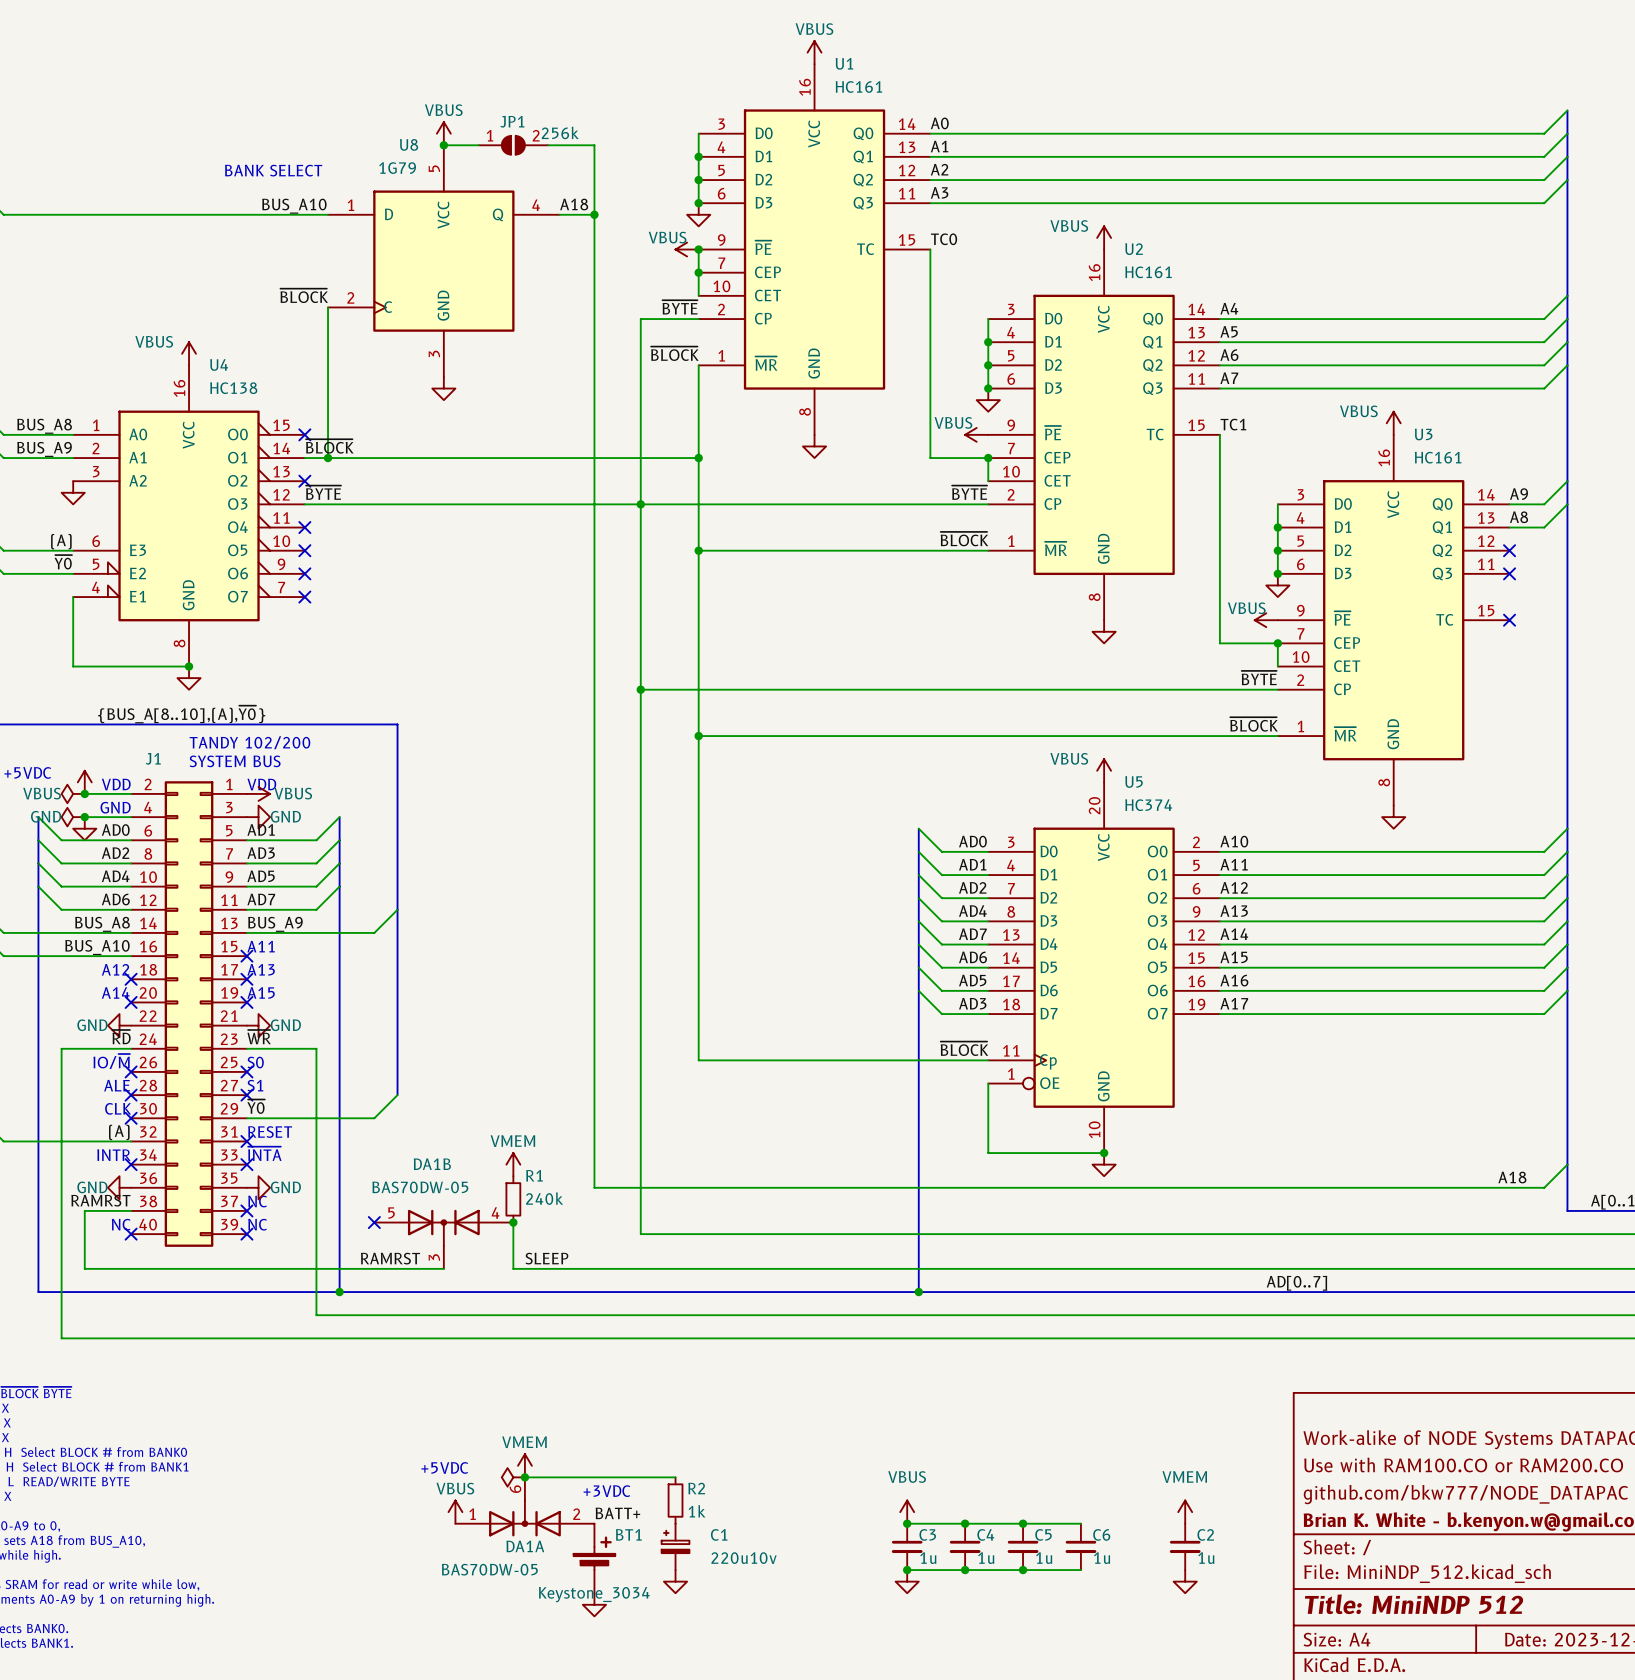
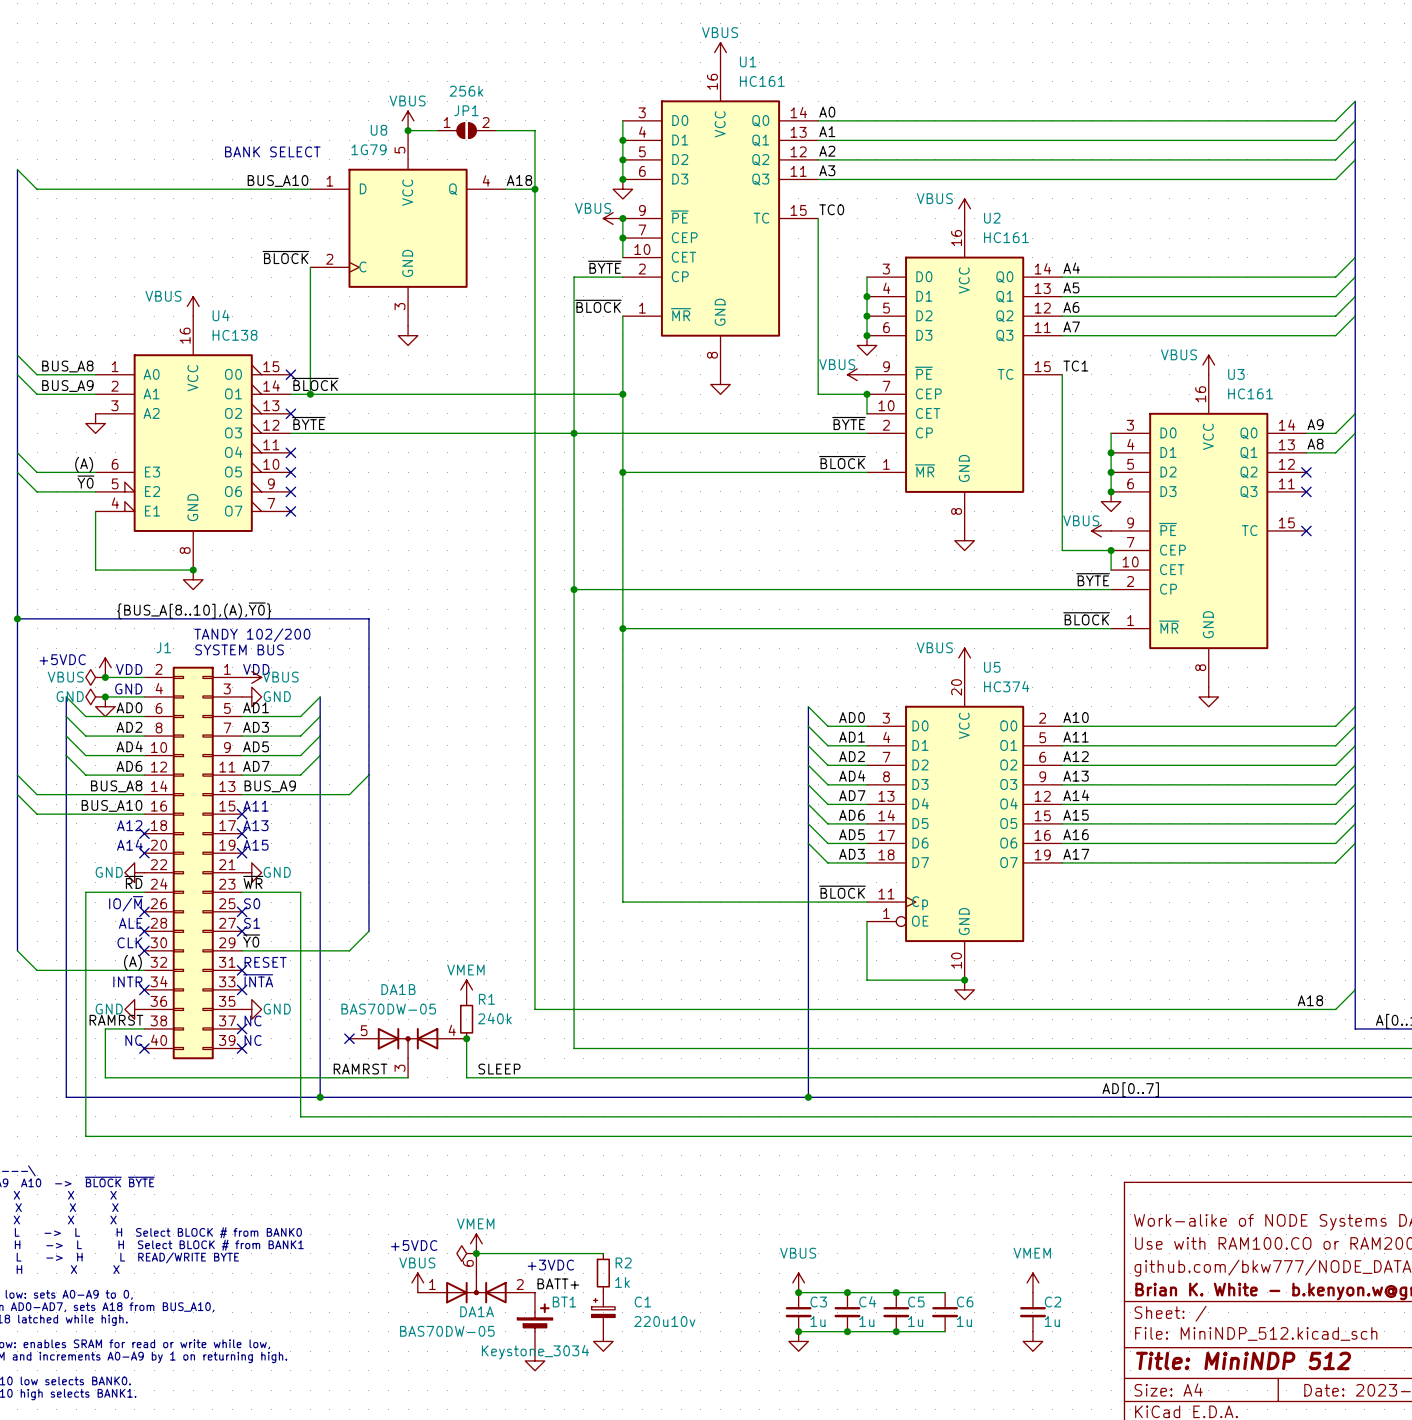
JP1 value position: 256k (560, 132) -> 256k (466, 91)

